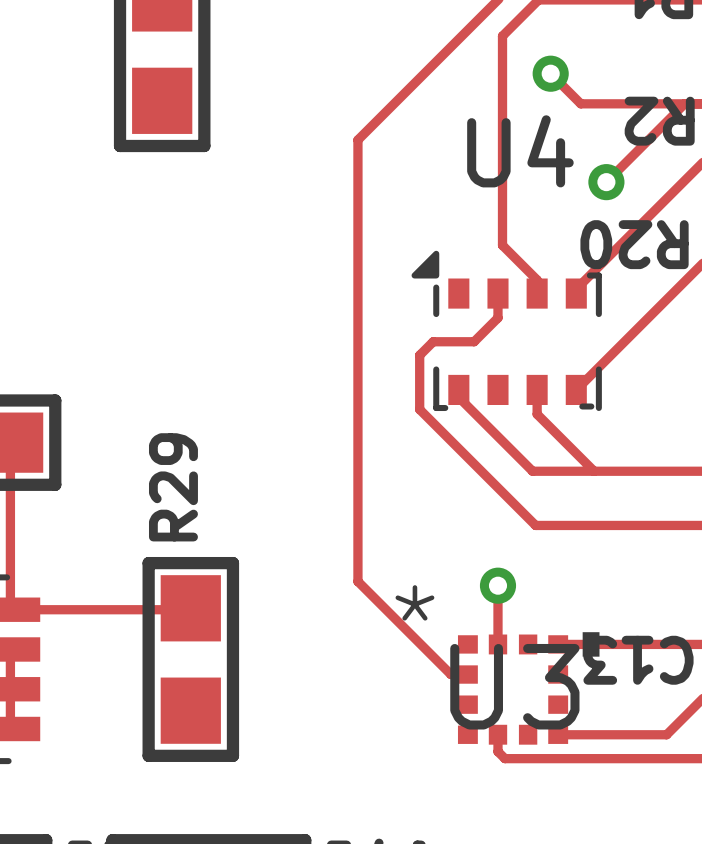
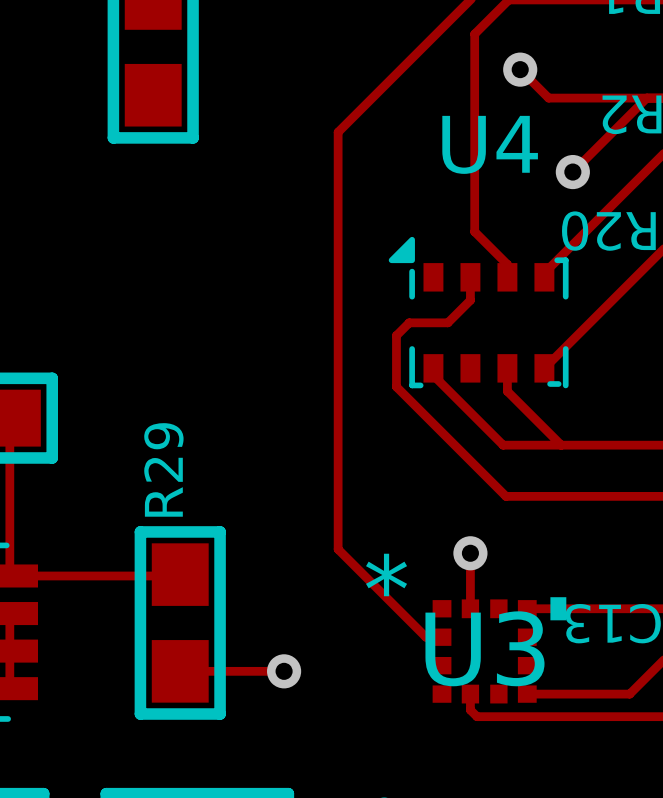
track: none -> (180, 671) (284, 671)
via: none -> (284, 671)

